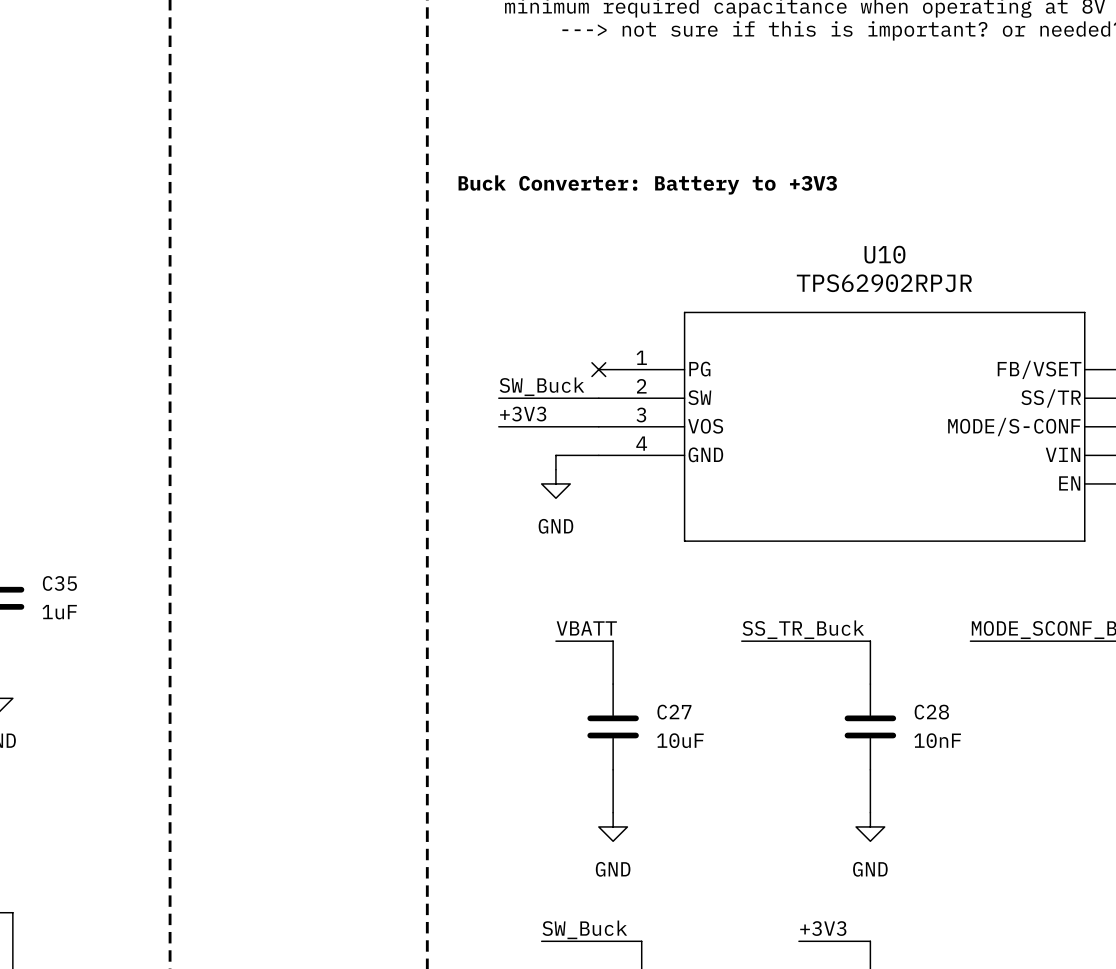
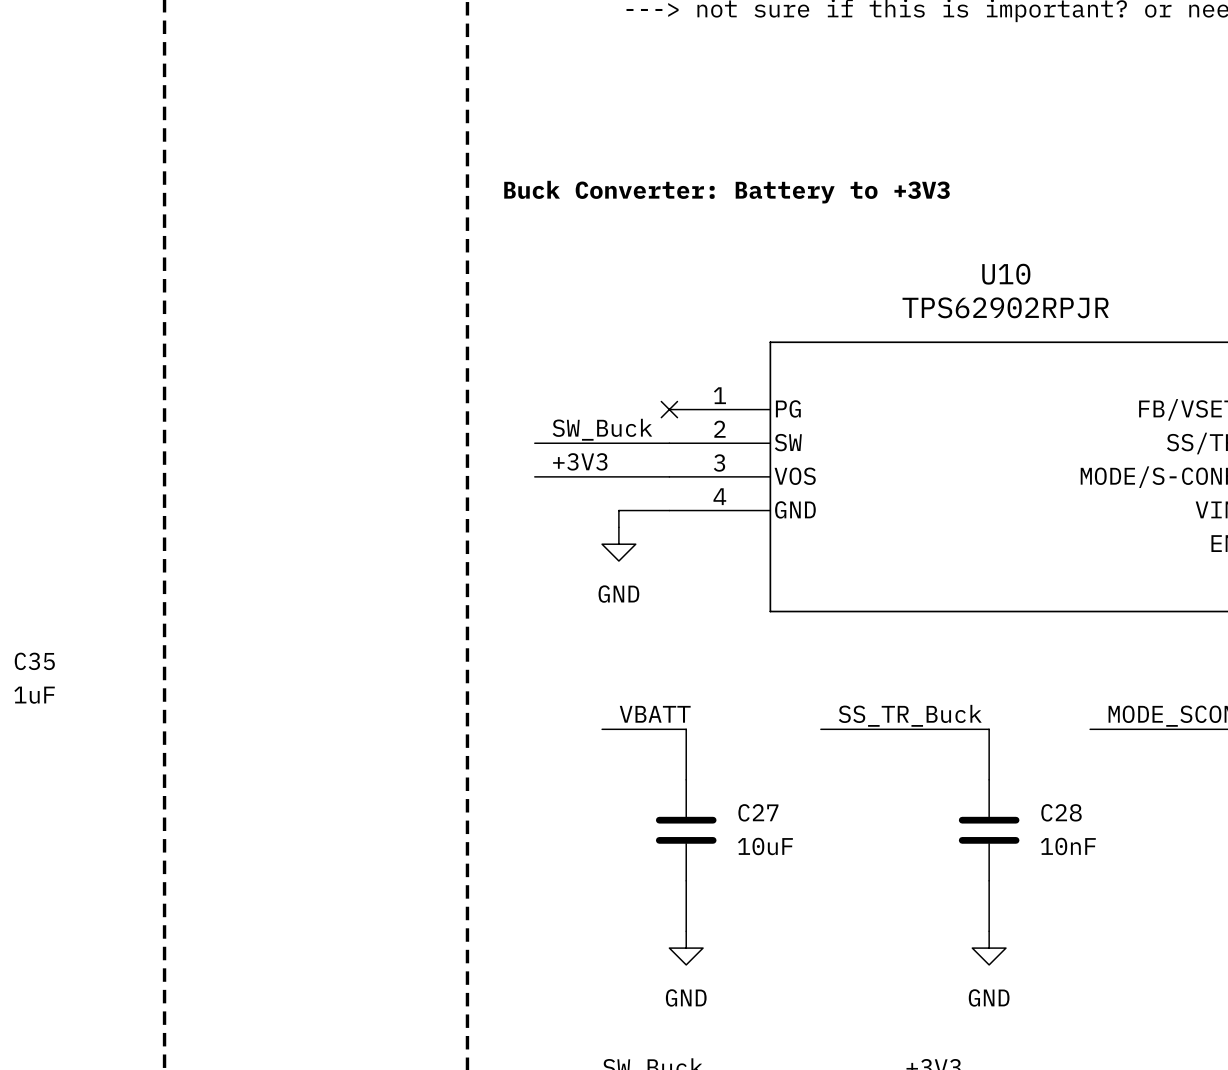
wire: none -> (534, 443) (551, 443)
wire: none -> (534, 476) (551, 476)
wire: none -> (602, 729) (618, 729)
wire: none -> (820, 729) (837, 729)
wire: none -> (1090, 729) (1106, 729)

